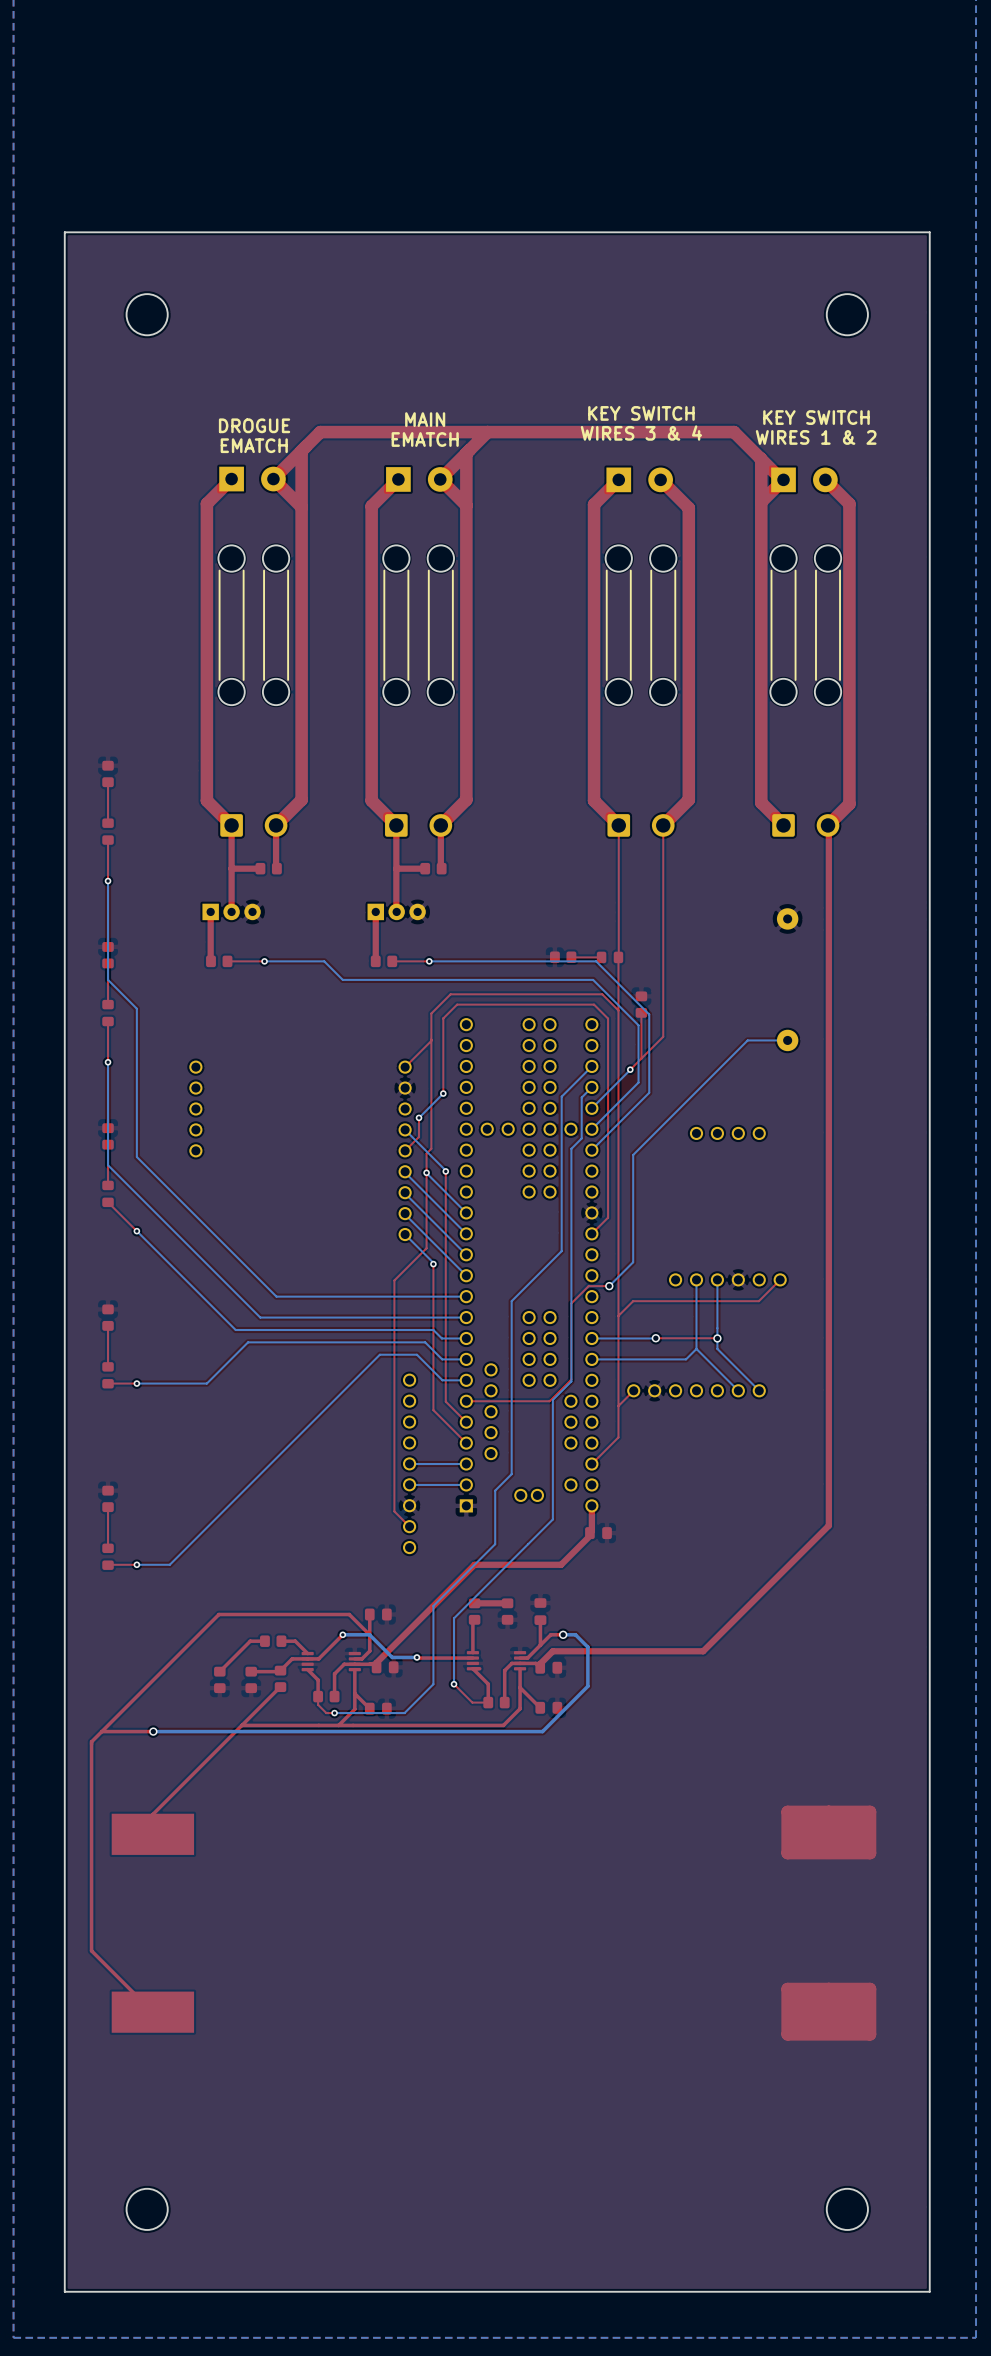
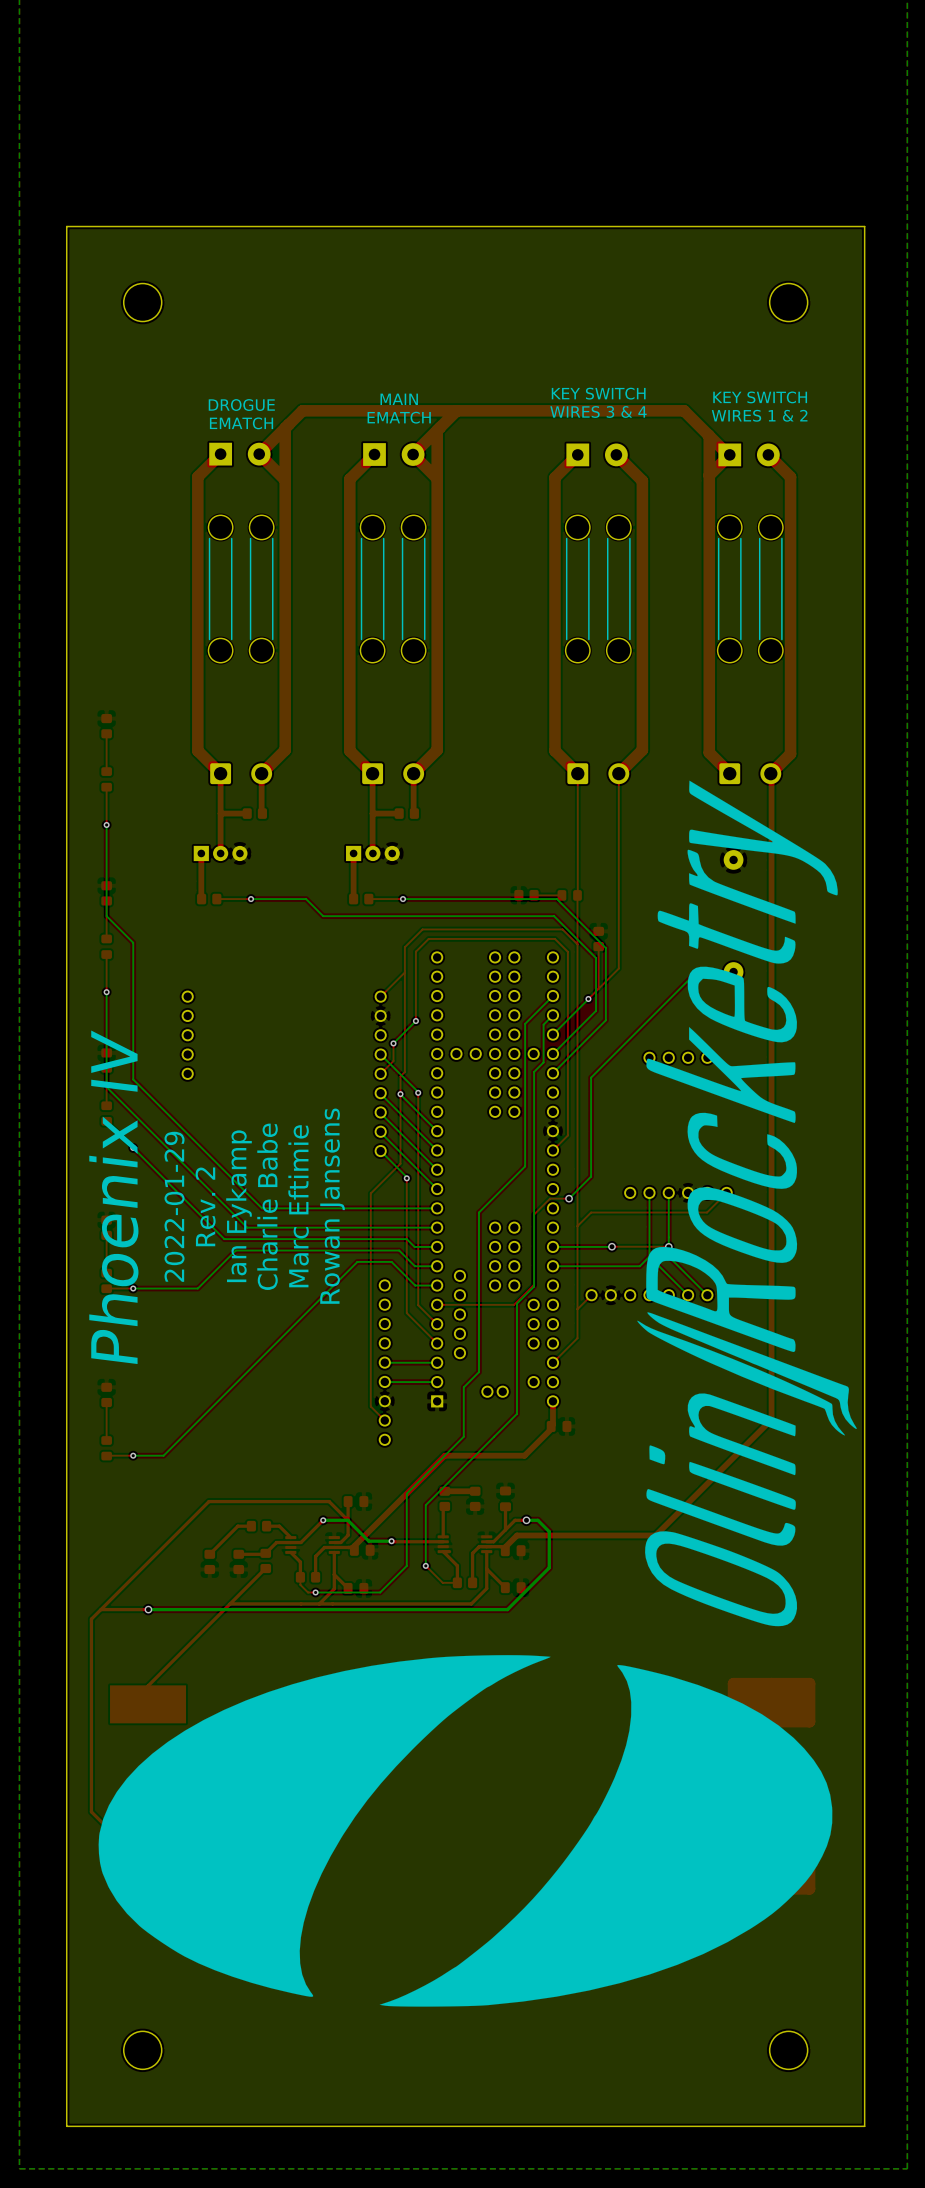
drawing: none -> [637, 780, 857, 1627]
text: none -> Phoenix IV (113, 1197)
text: none -> Rev. 2 (205, 1206)
text: none -> Ian Eykamp (239, 1206)
text: none -> Charlie Babe (267, 1206)
text: none -> Marc Eftimie (298, 1206)
text: none -> Rowan Jansens (332, 1206)
text: none -> 2022-01-29 (174, 1206)
drawing: none -> [98, 1655, 833, 2007]

